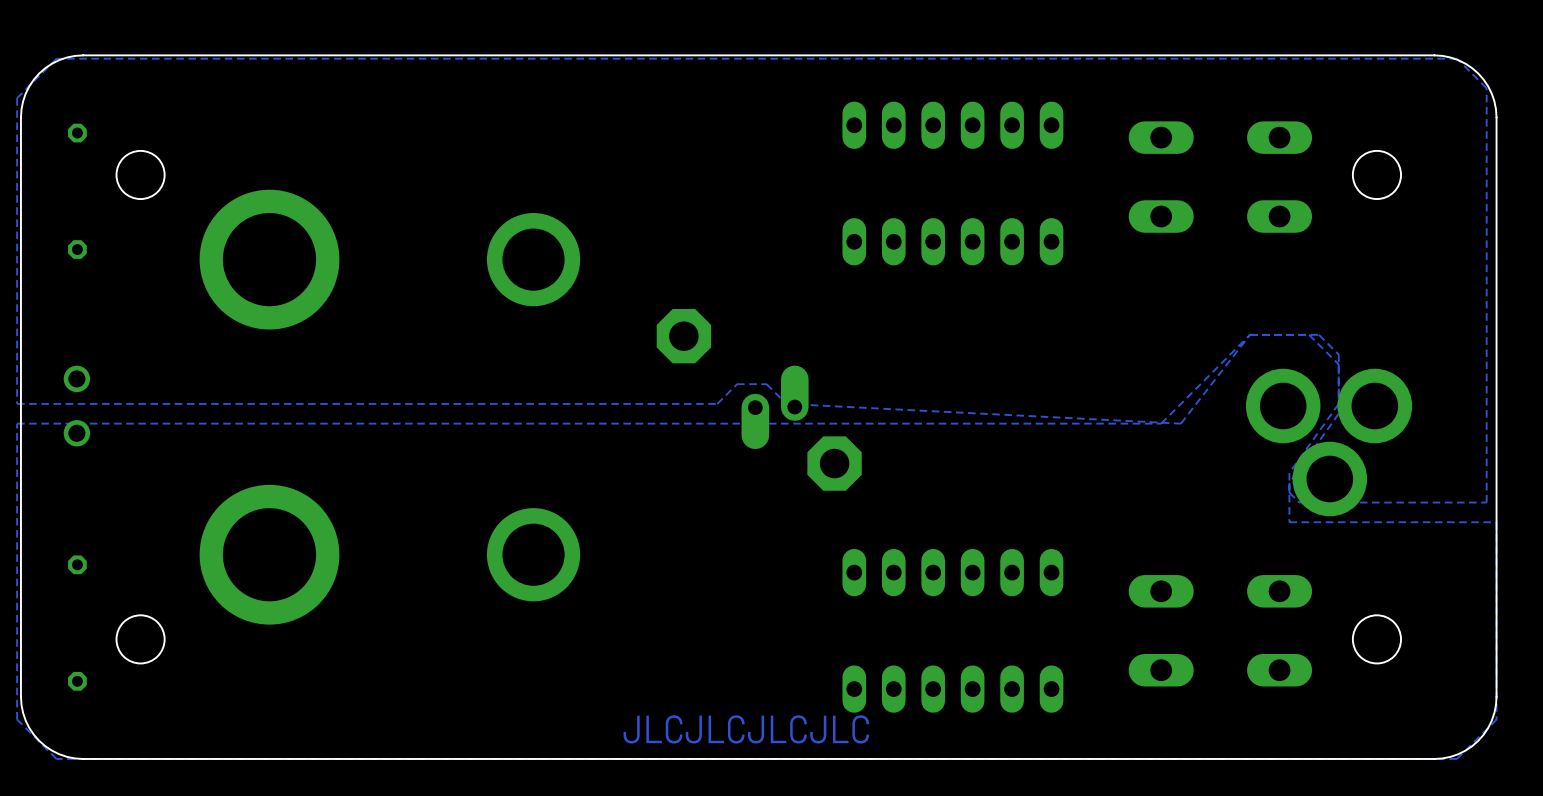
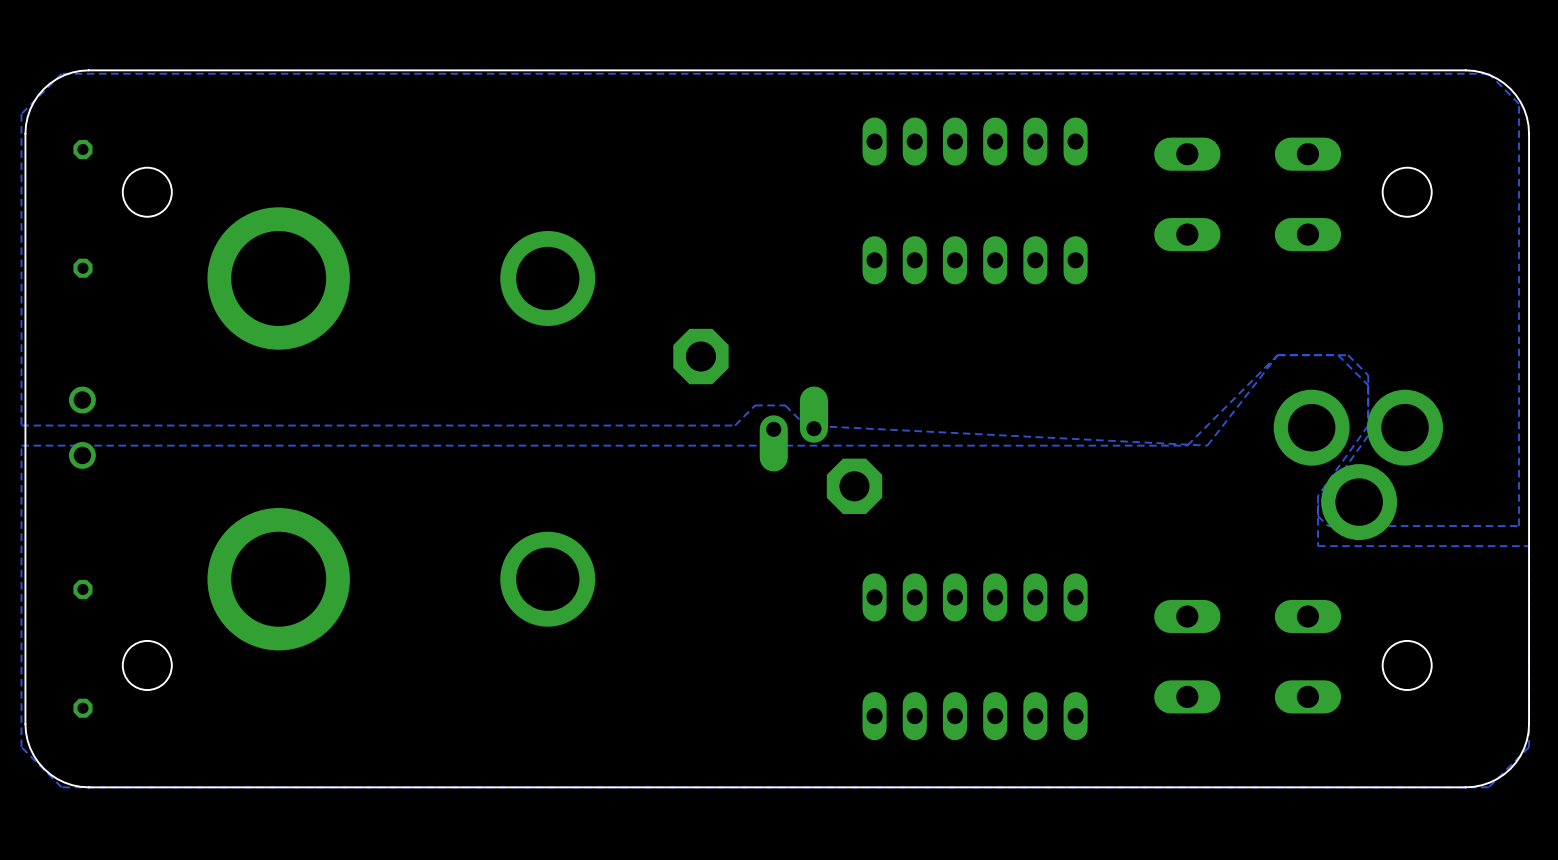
text: JLCJLCJLCJLC (746, 729) -> none

